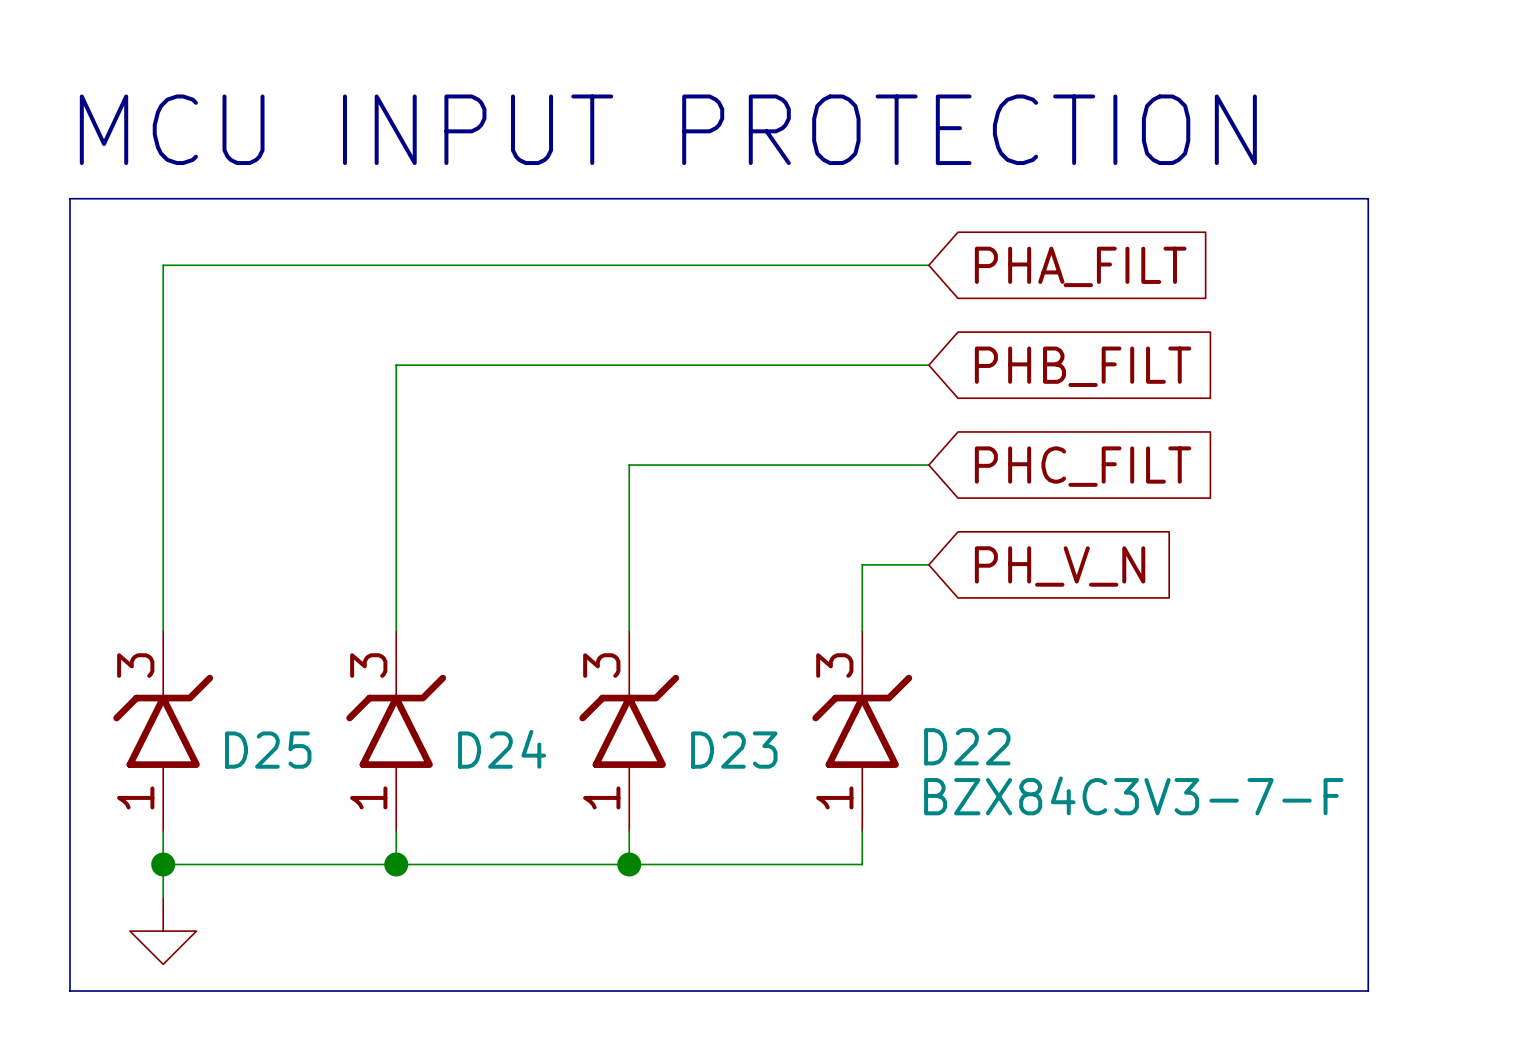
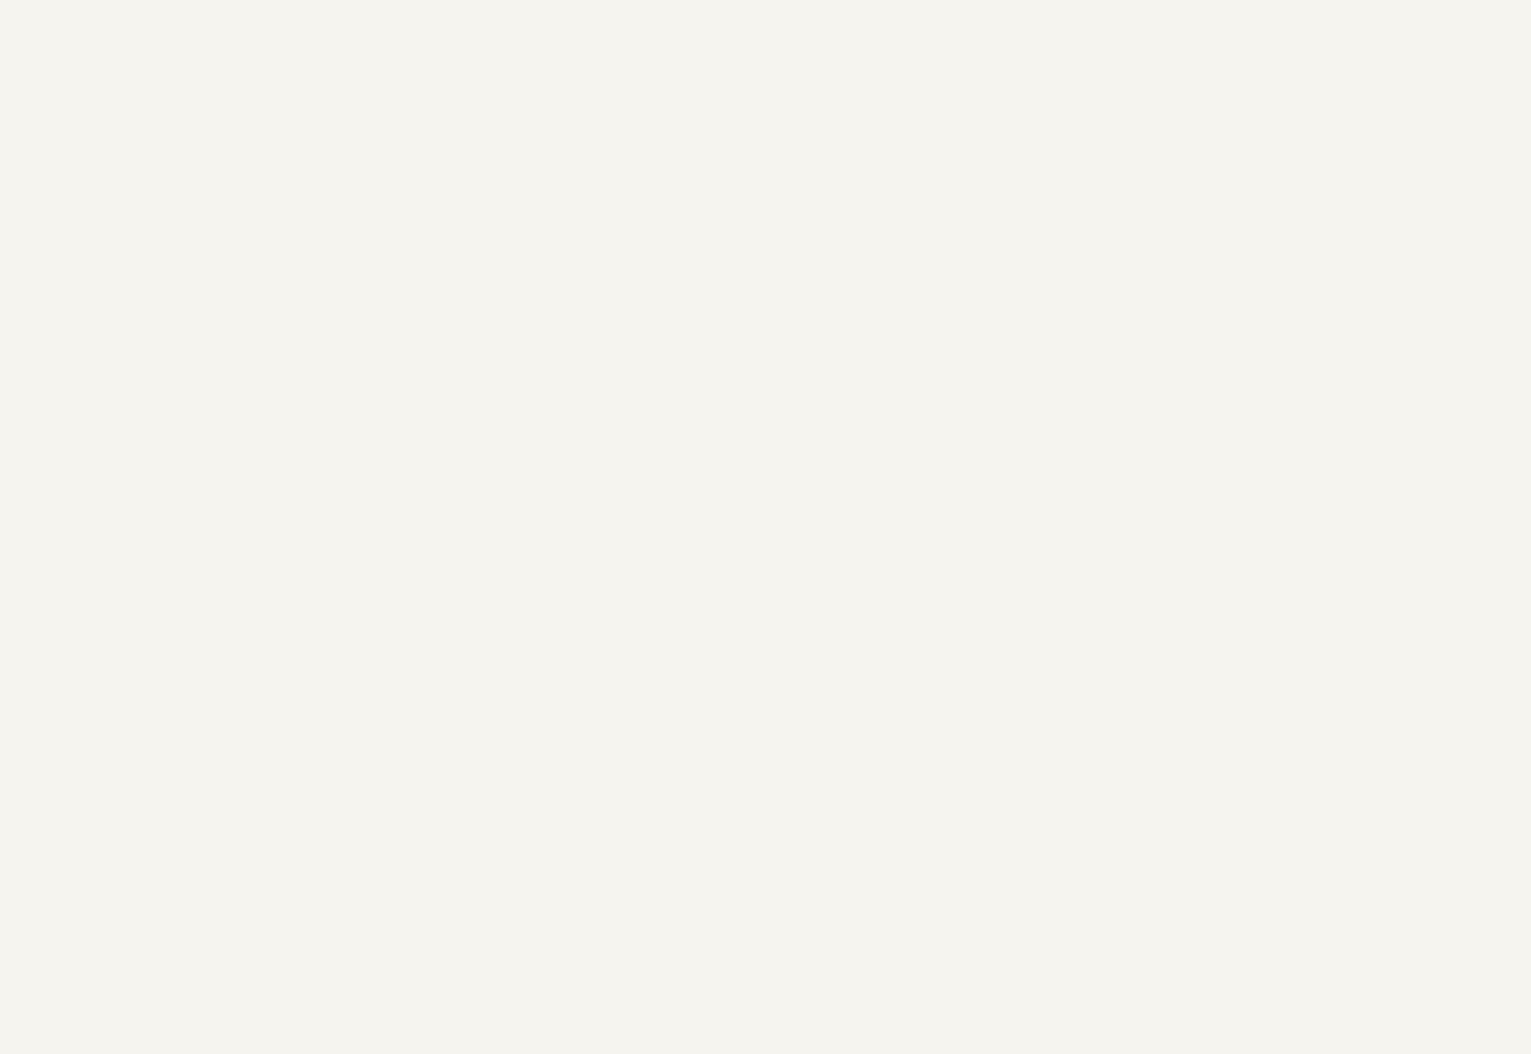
text: MCU INPUT PROTECTION (668, 129) -> none
line: (70, 198) (1368, 198) (1368, 991) (70, 991) (70, 198) -> none
wire: (928, 265) (163, 265) (163, 631) -> none
global label: PHA_FILT (1080, 266) -> none
wire: (928, 365) (396, 365) (396, 631) -> none
global label: PHB_FILT (1083, 366) -> none
wire: (928, 465) (629, 465) (629, 631) -> none
global label: PHC_FILT (1083, 466) -> none
wire: (928, 564) (862, 564) (862, 631) -> none
global label: PH_V_N (1060, 566) -> none
D25: (163, 731) -> none
D24: (396, 731) -> none
D23: (629, 731) -> none
D22: BZX84C3V3-7-F (862, 731) -> none
wire: (163, 831) (163, 897) -> none
wire: (396, 831) (396, 864) -> none
wire: (629, 831) (629, 864) -> none
wire: (862, 831) (862, 864) (163, 864) -> none
junction: (163, 864) -> none
junction: (396, 864) -> none
junction: (629, 864) -> none
power symbol: (163, 931) -> none

